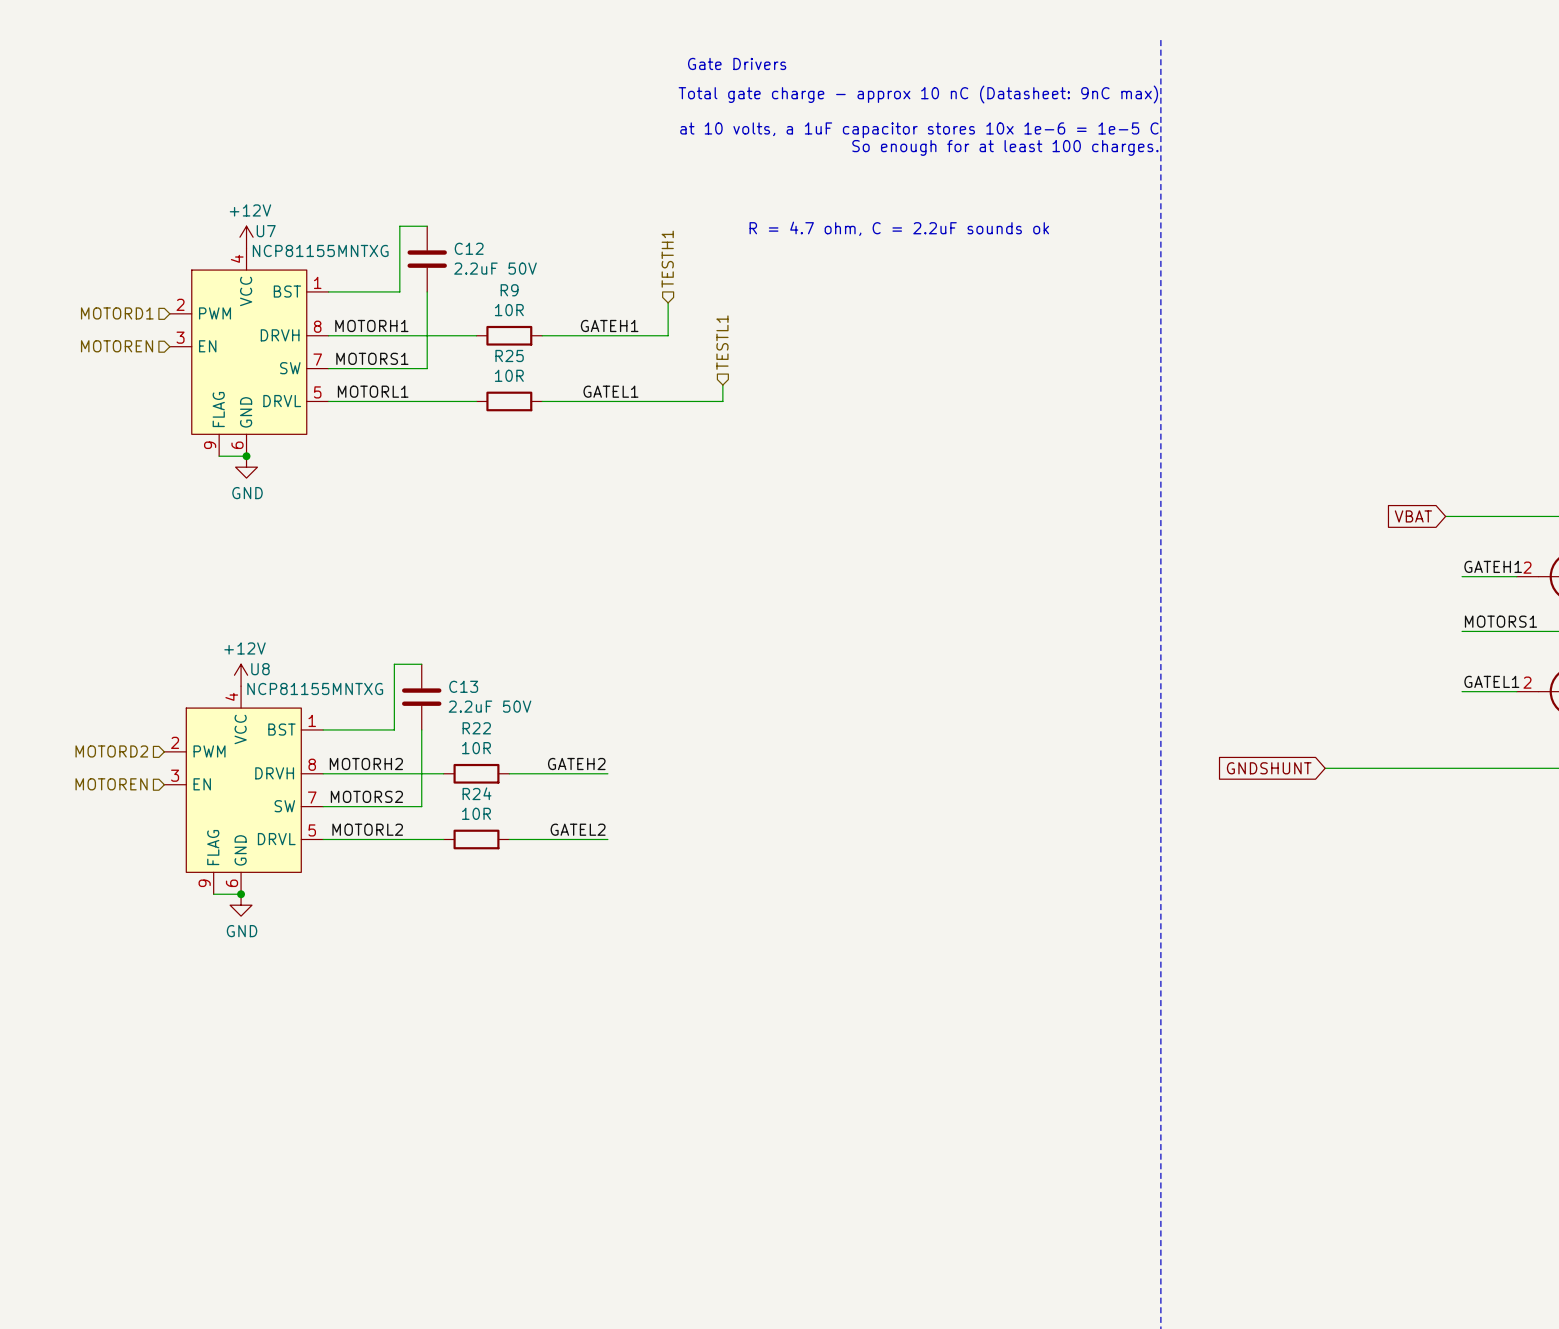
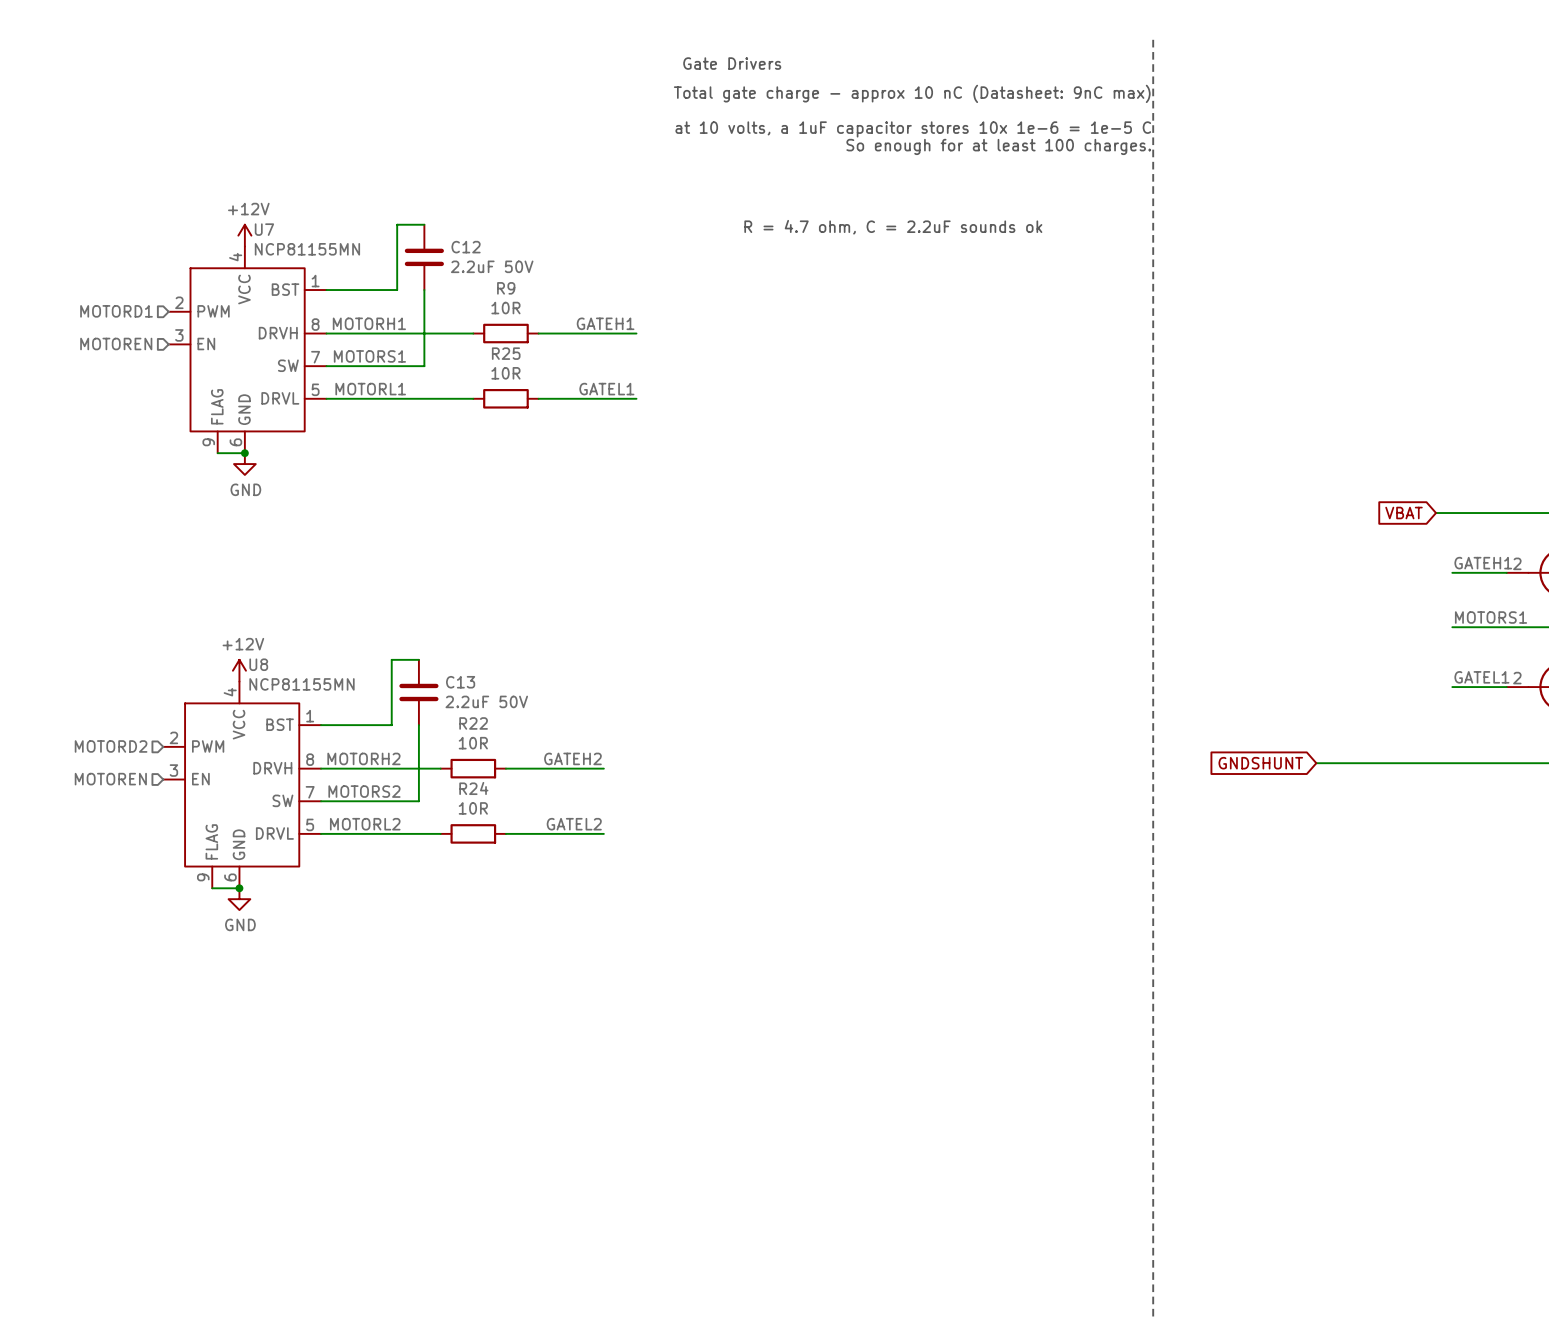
U7 value: NCP81155MNTXG (320, 250) -> NCP81155MN (307, 249)
hierarchical label: TESTH1 (667, 259) -> none
wire: (668, 302) (668, 335) (640, 335) -> none
hierarchical label: TESTL1 (722, 342) -> none
wire: (722, 385) (722, 401) (640, 401) -> none
U8 value: NCP81155MNTXG (315, 688) -> NCP81155MN (301, 684)

